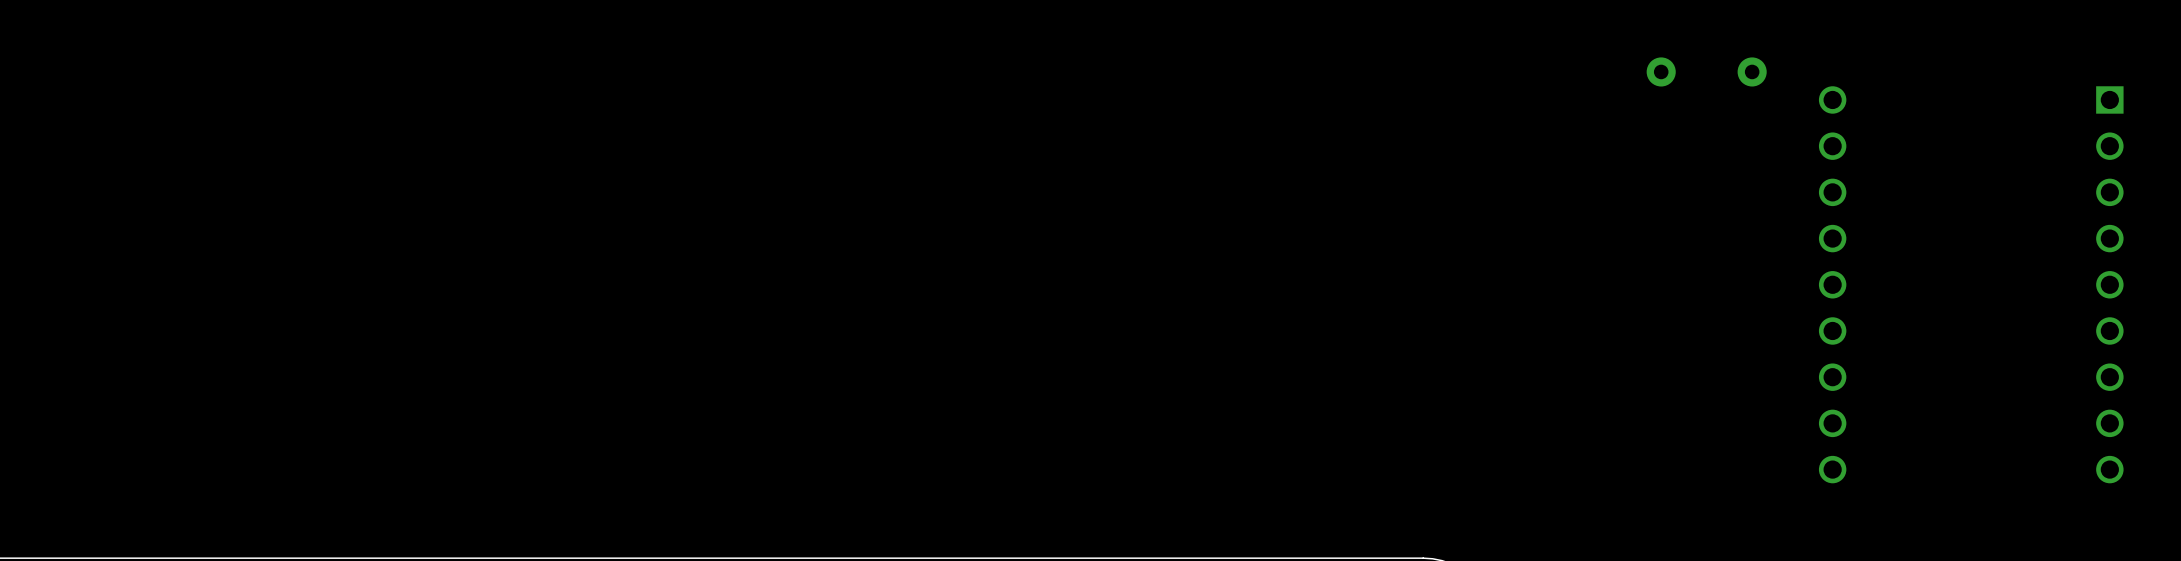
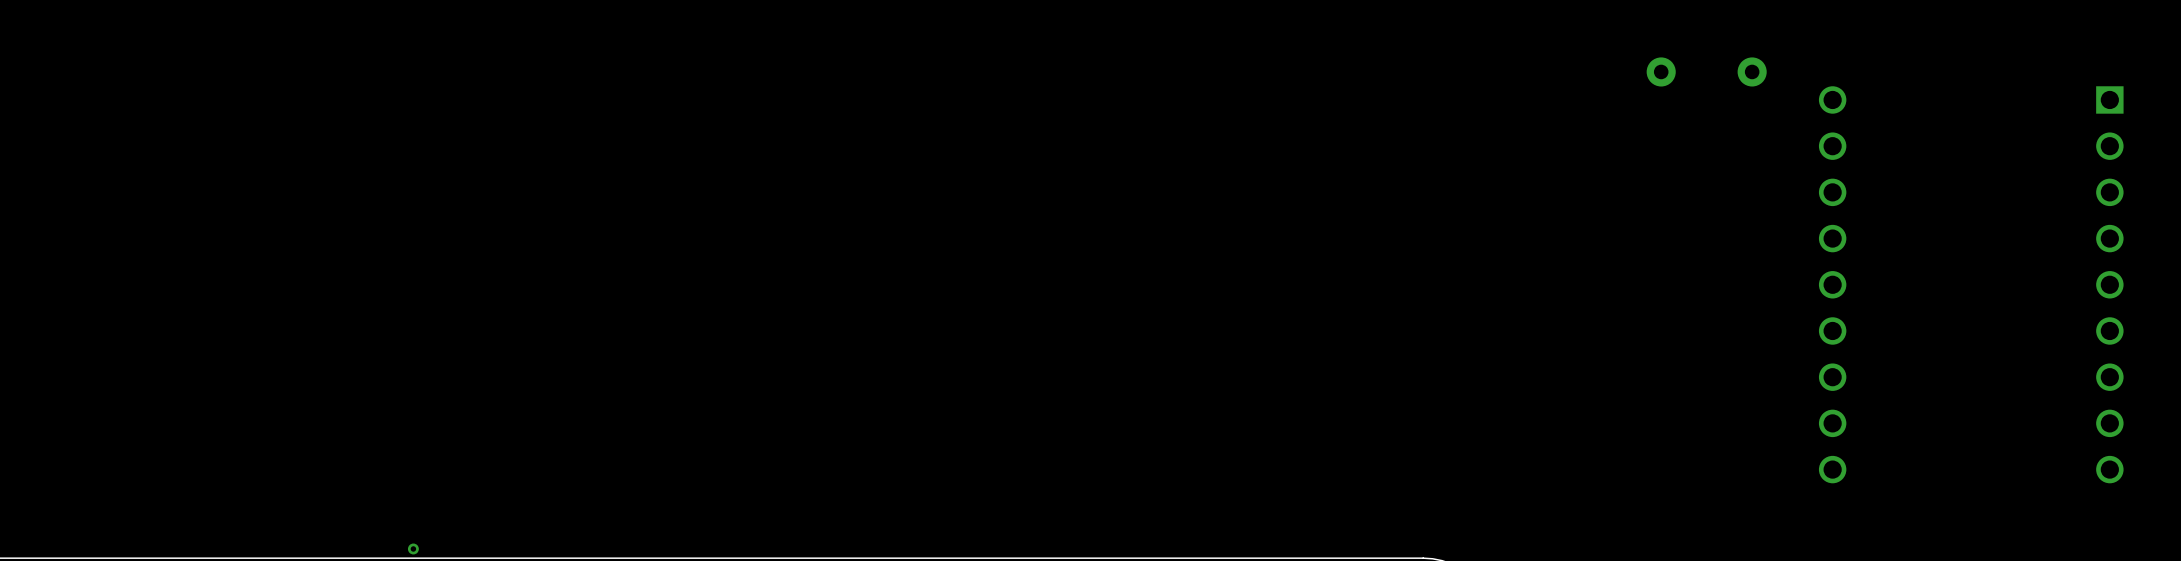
via: none -> (413, 548)

